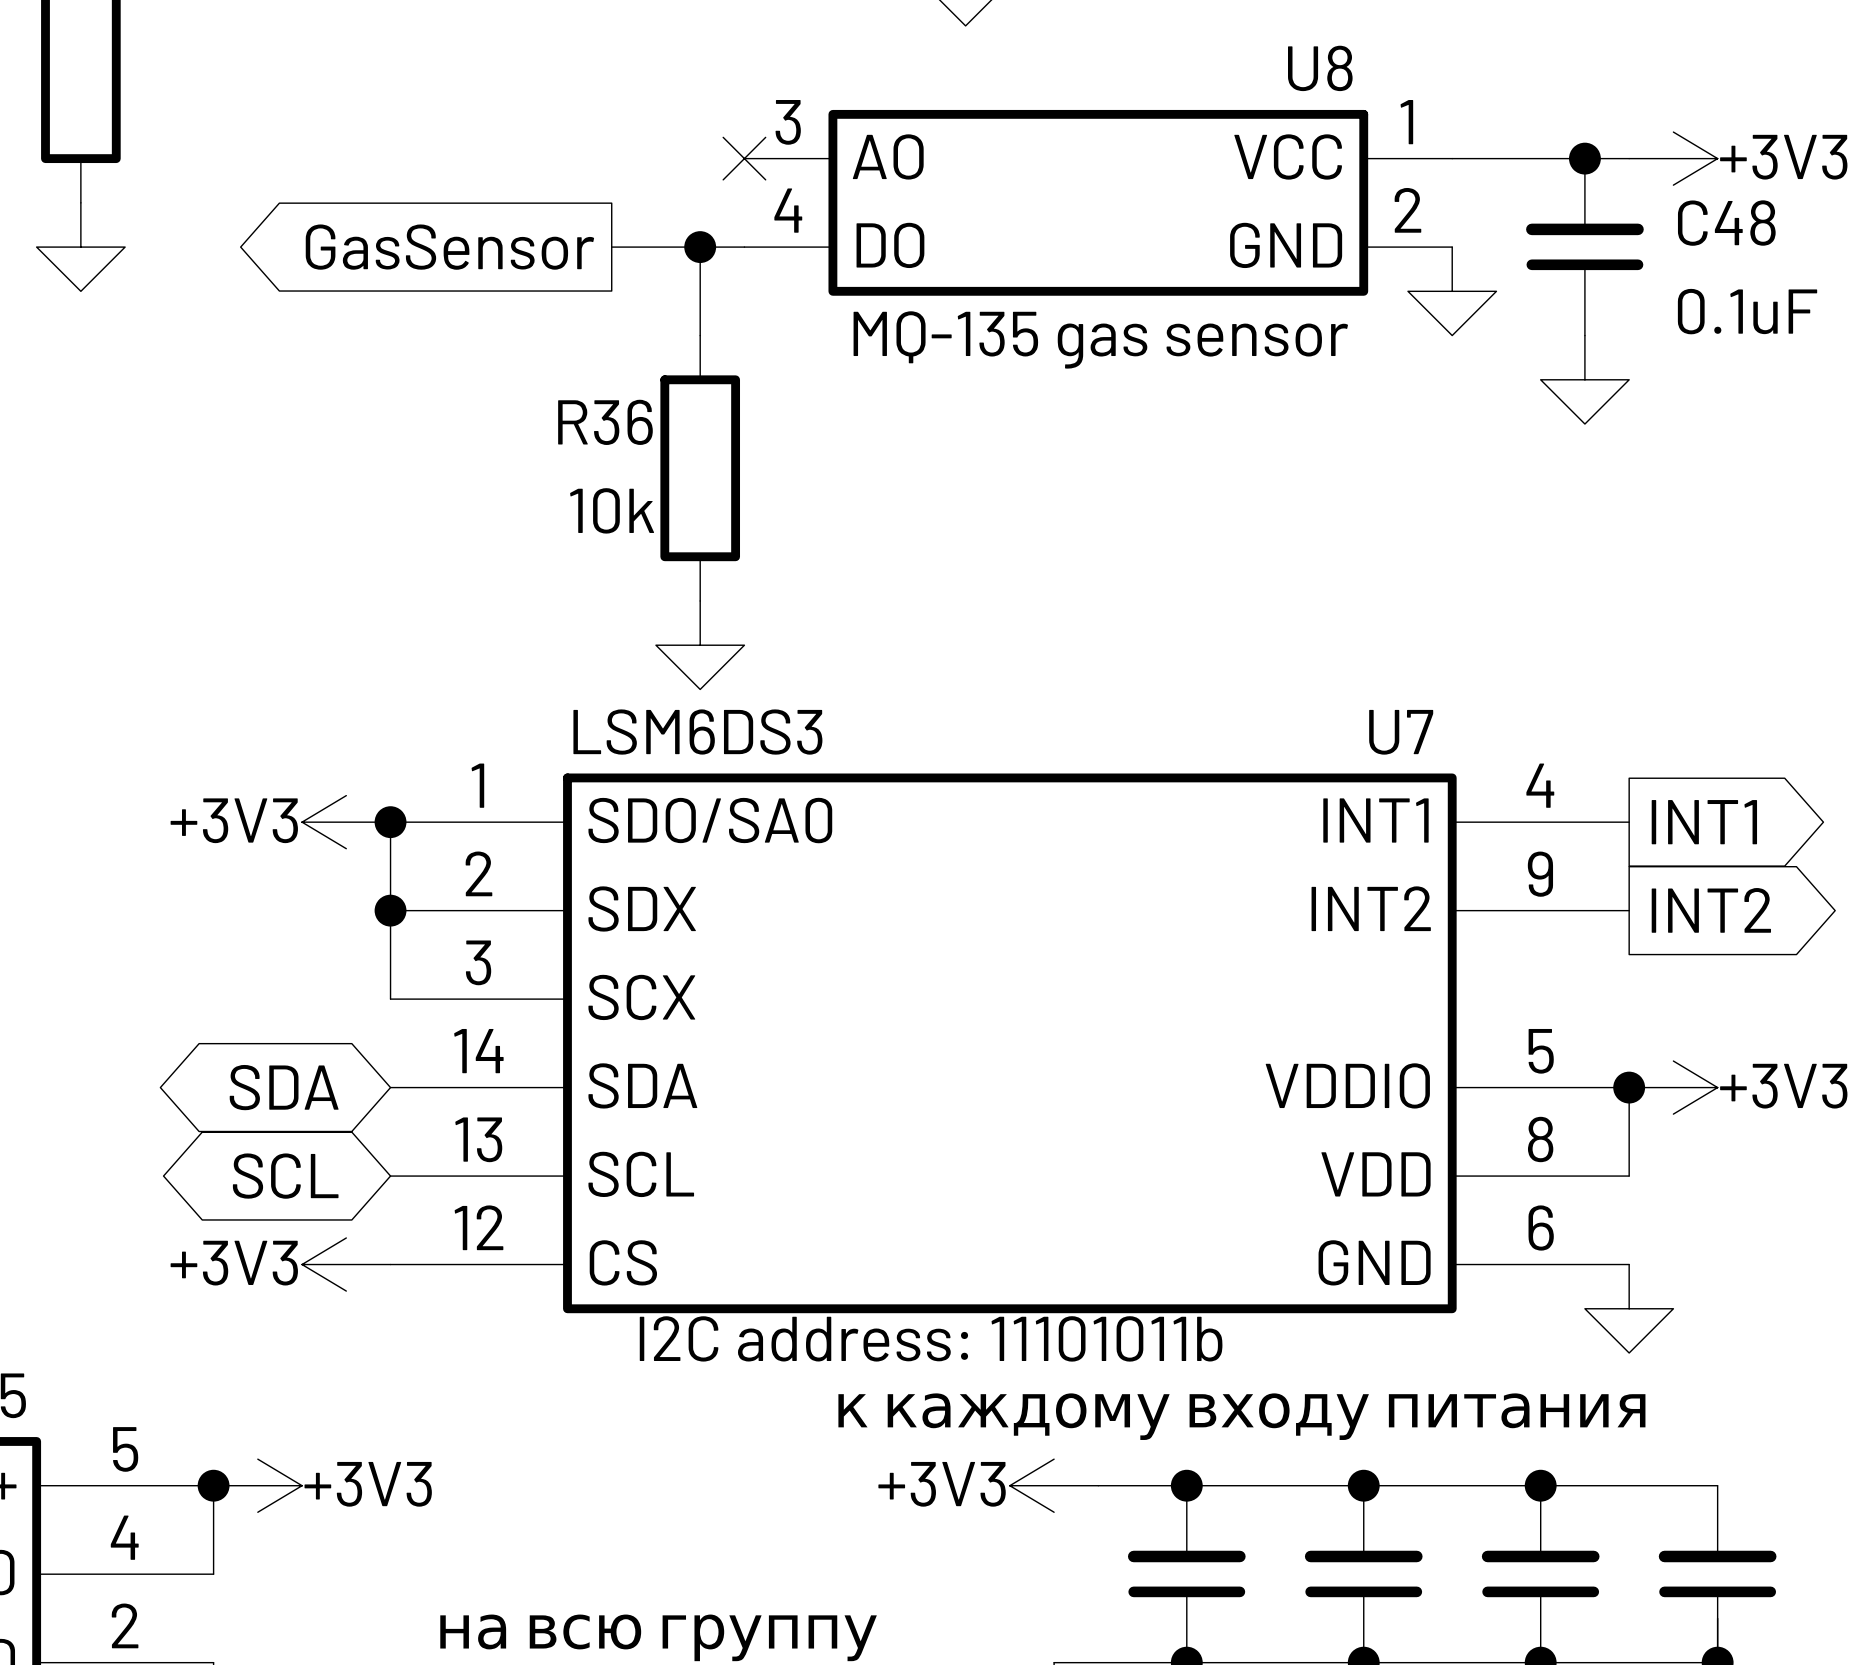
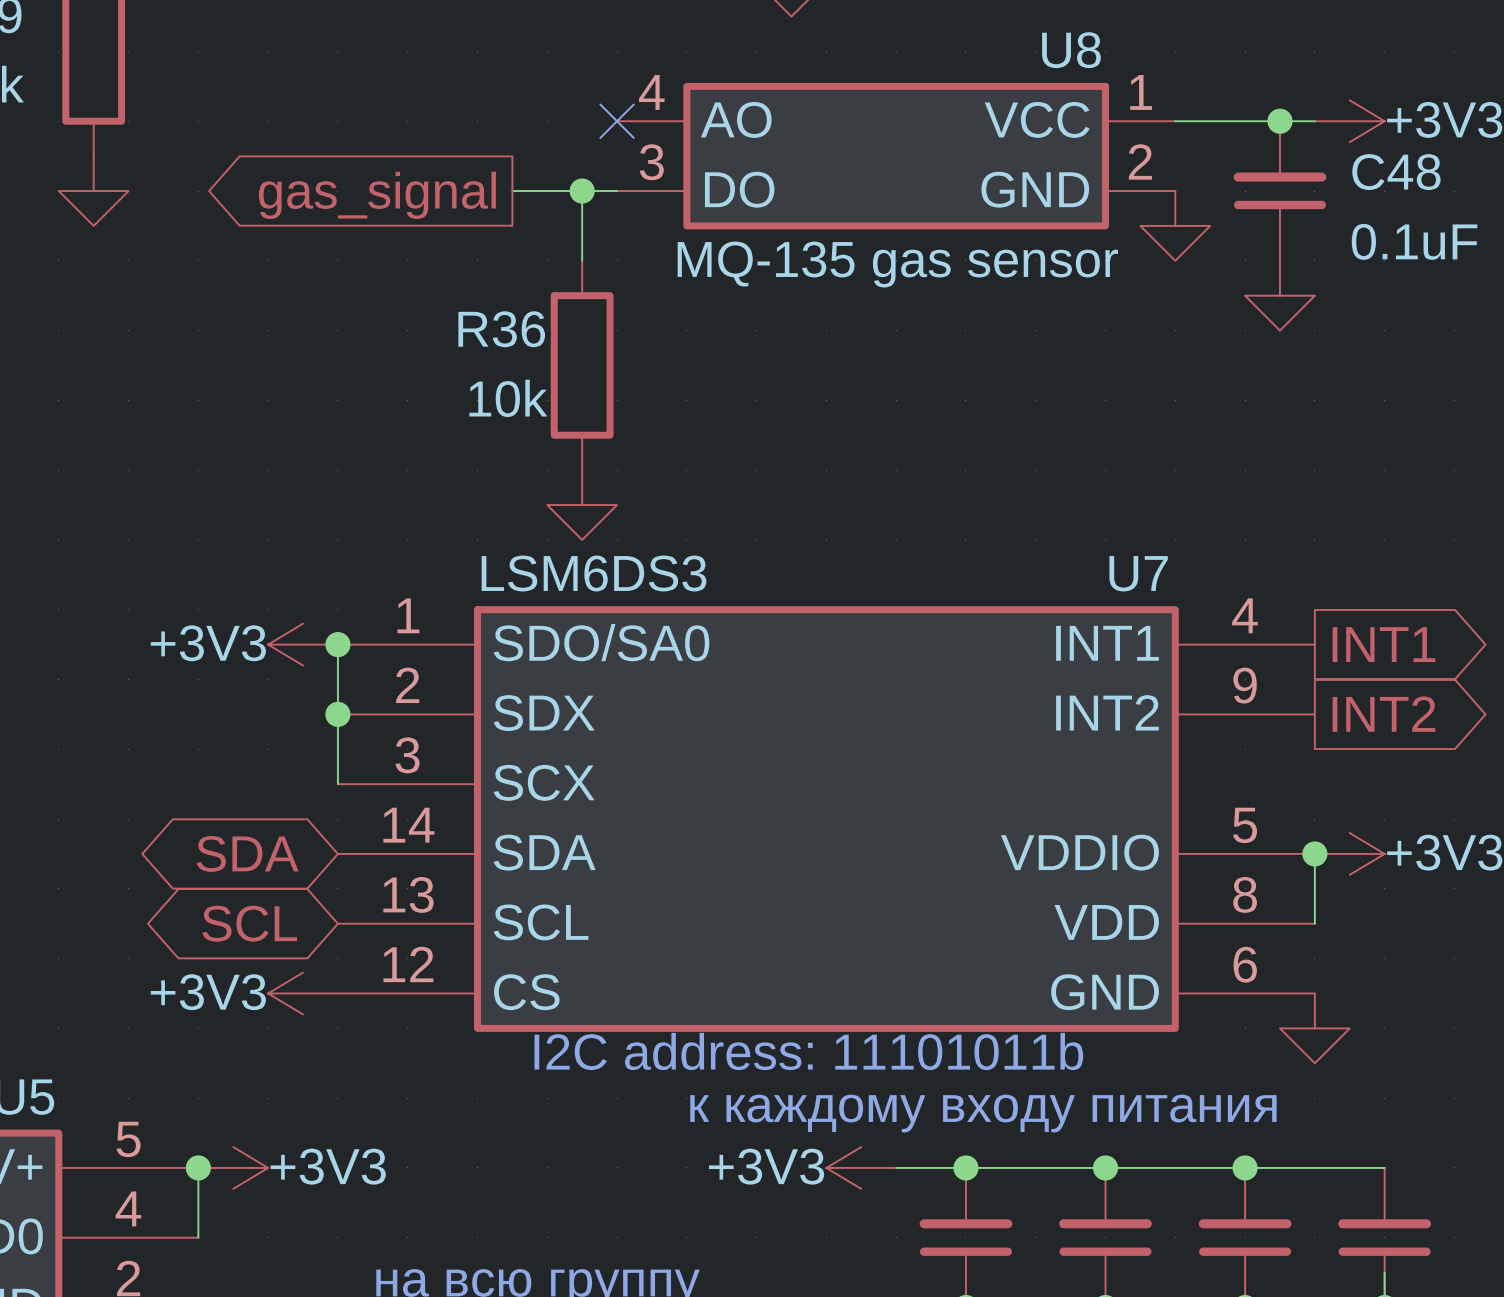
U8 pin number: 3 (788, 122) -> 4 (651, 92)
U8 pin number: 4 (788, 210) -> 3 (651, 162)
global label: GasSensor (449, 247) -> gas_signal (377, 195)

